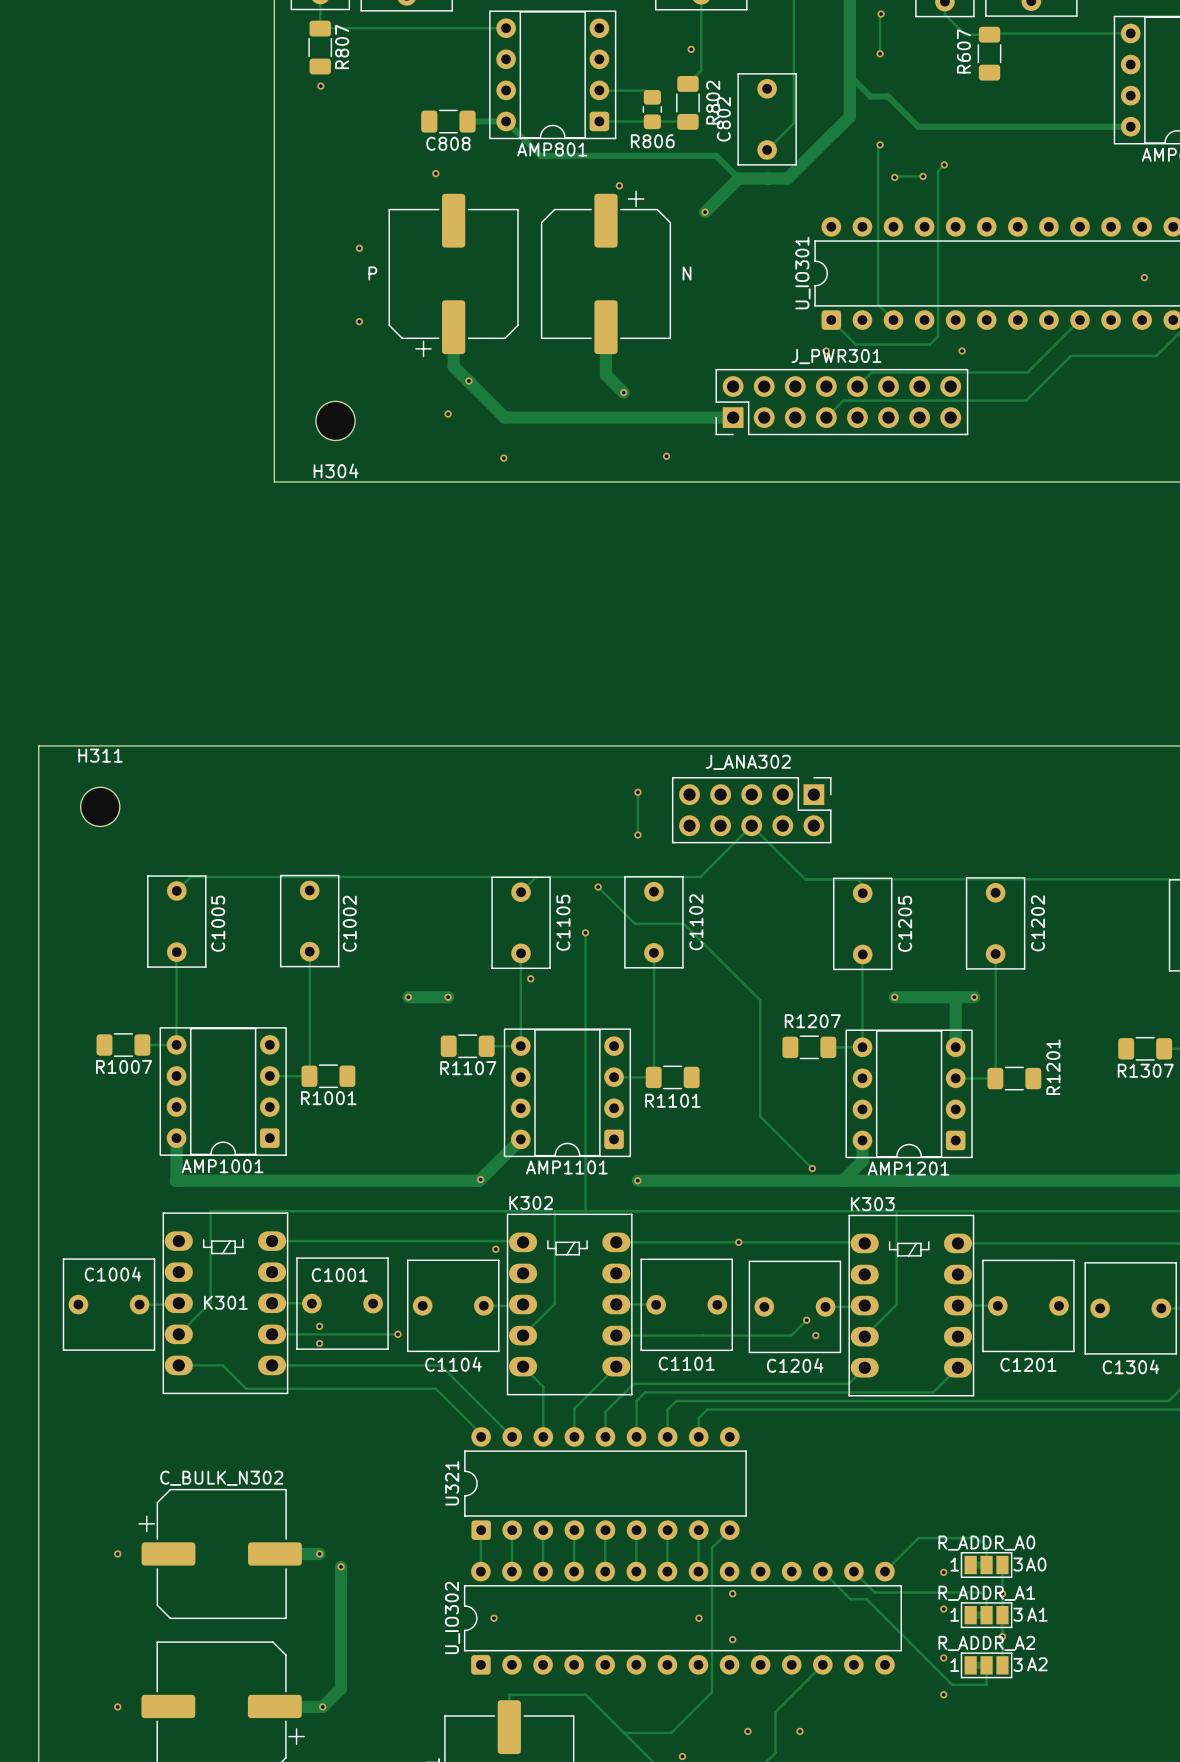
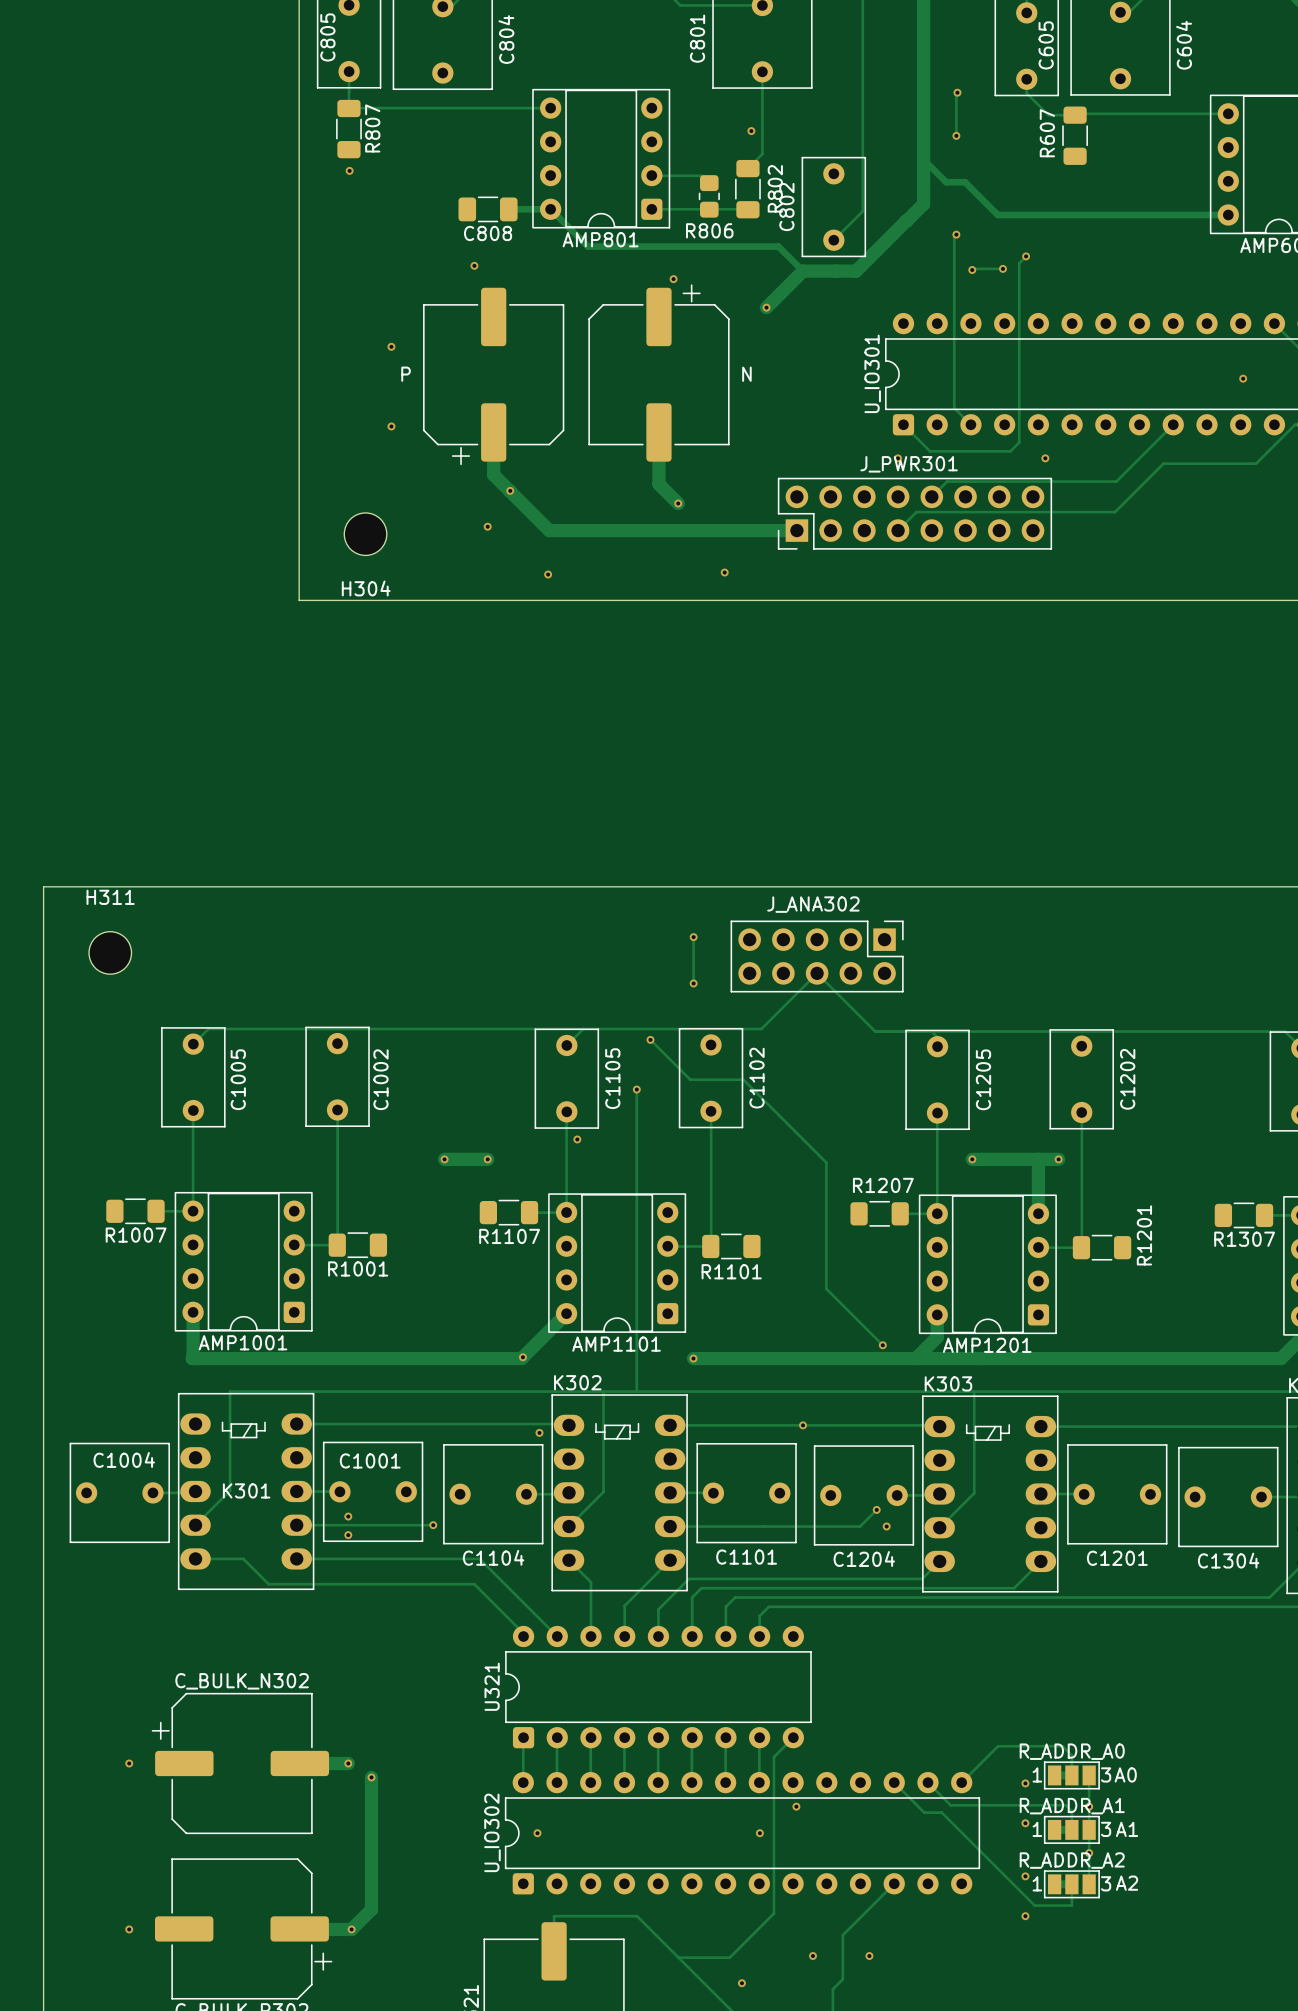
via: (732, 1639) -> none

